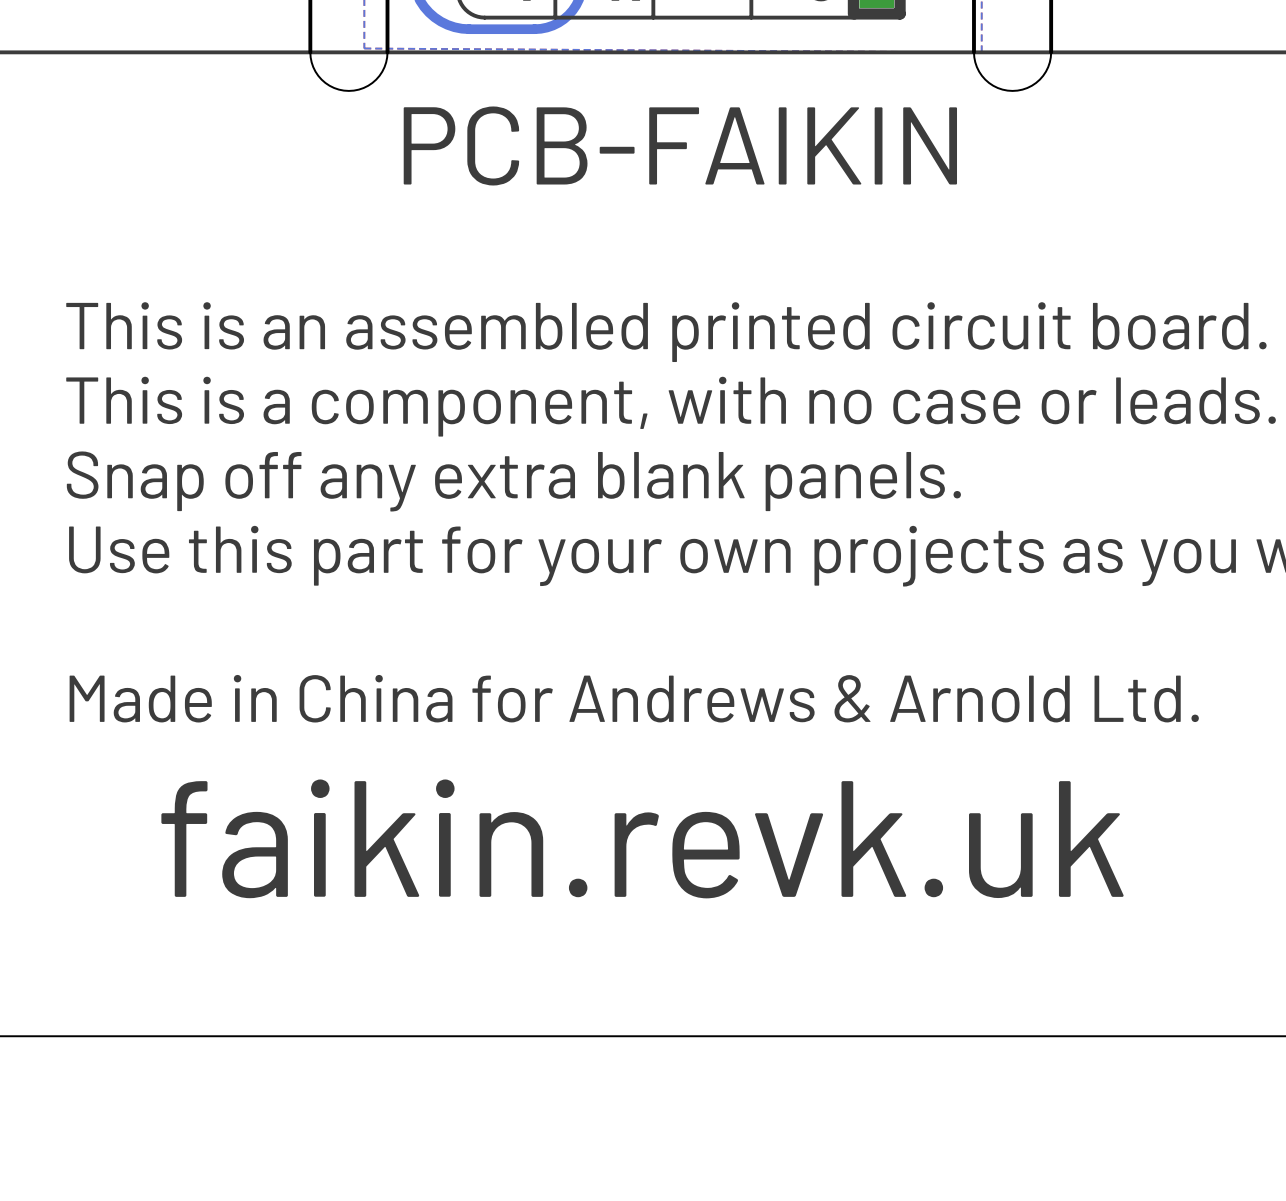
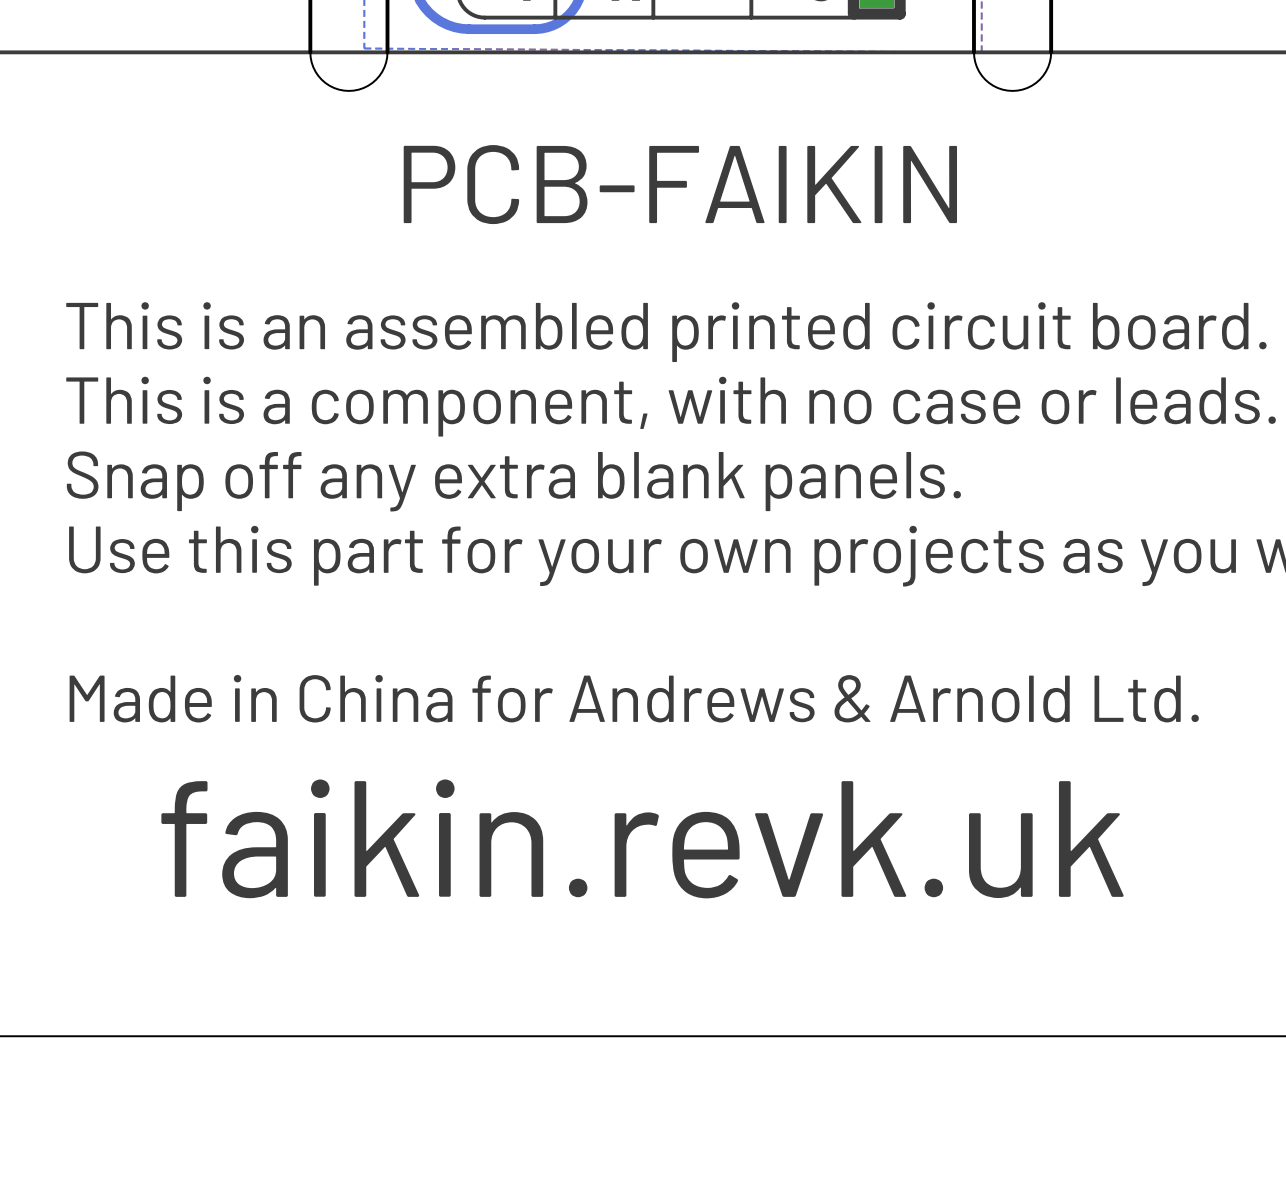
text position: PCB-FAIKIN (680, 145) -> PCB-FAIKIN (680, 184)

